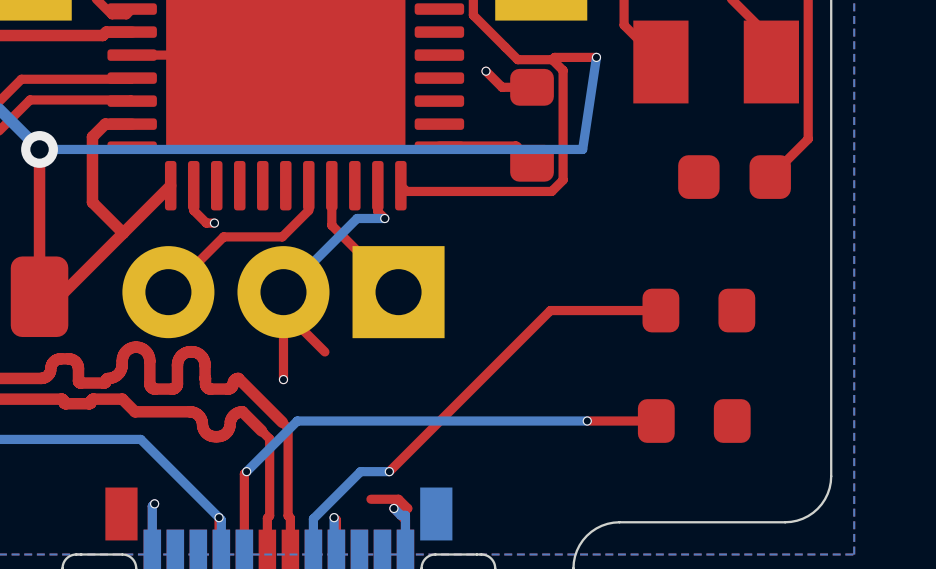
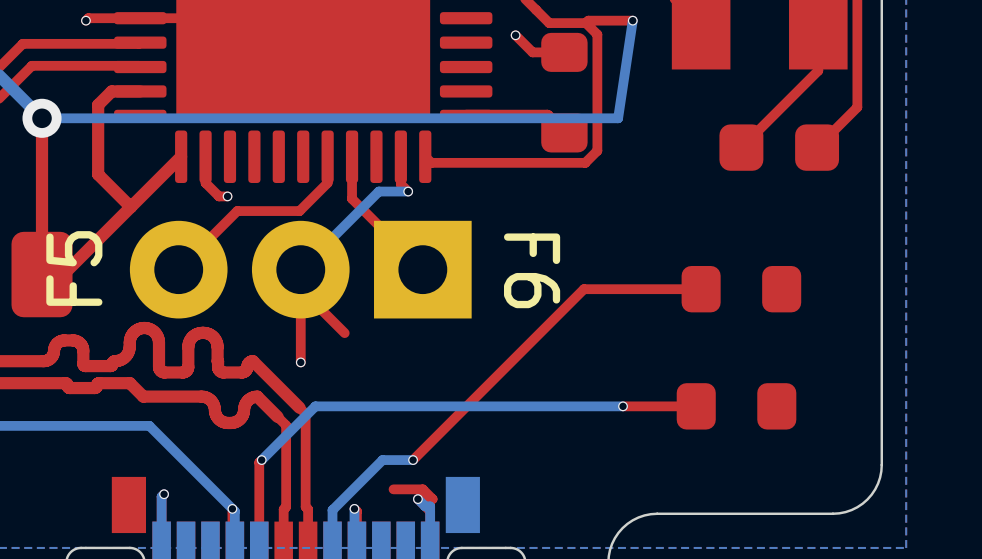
top track: none -> (140, 18) (88, 18) (85, 20)
via: none -> (85, 20)
top track: none -> (818, 25) (818, 70) (741, 147)
text: none -> F5 (74, 268)
text: none -> F6 (532, 270)

